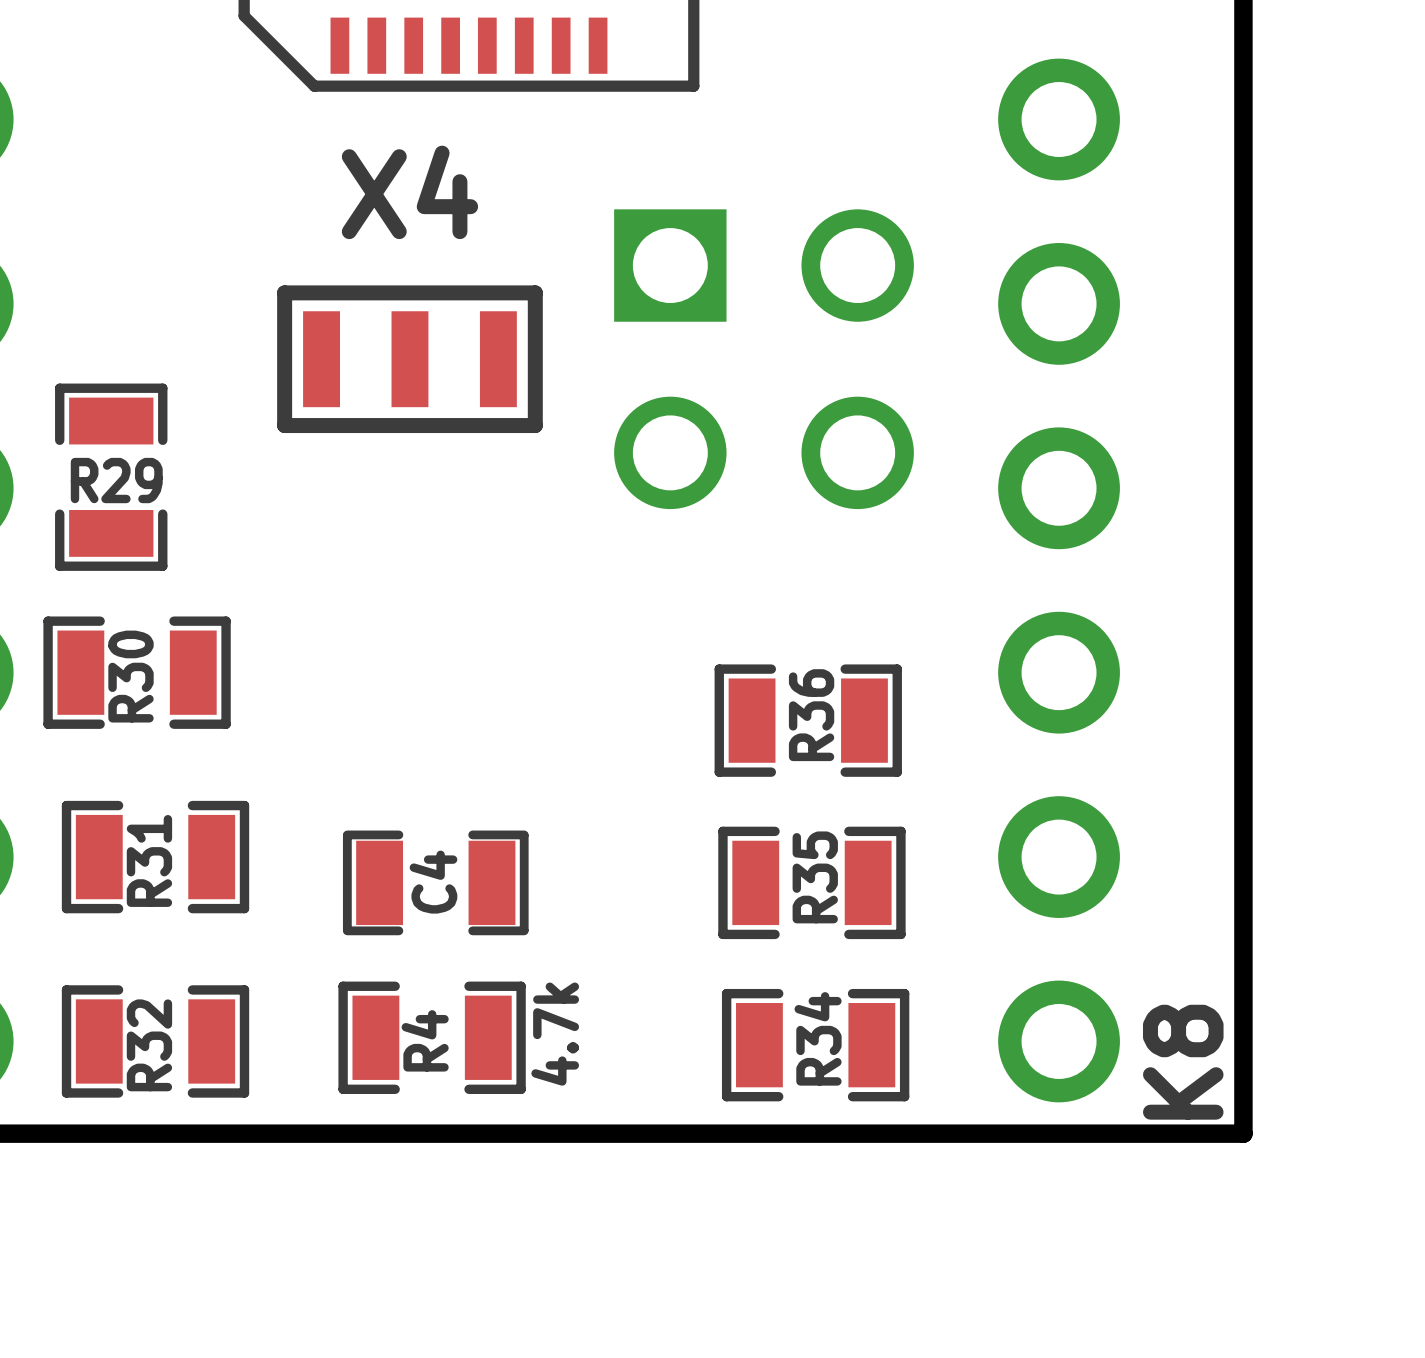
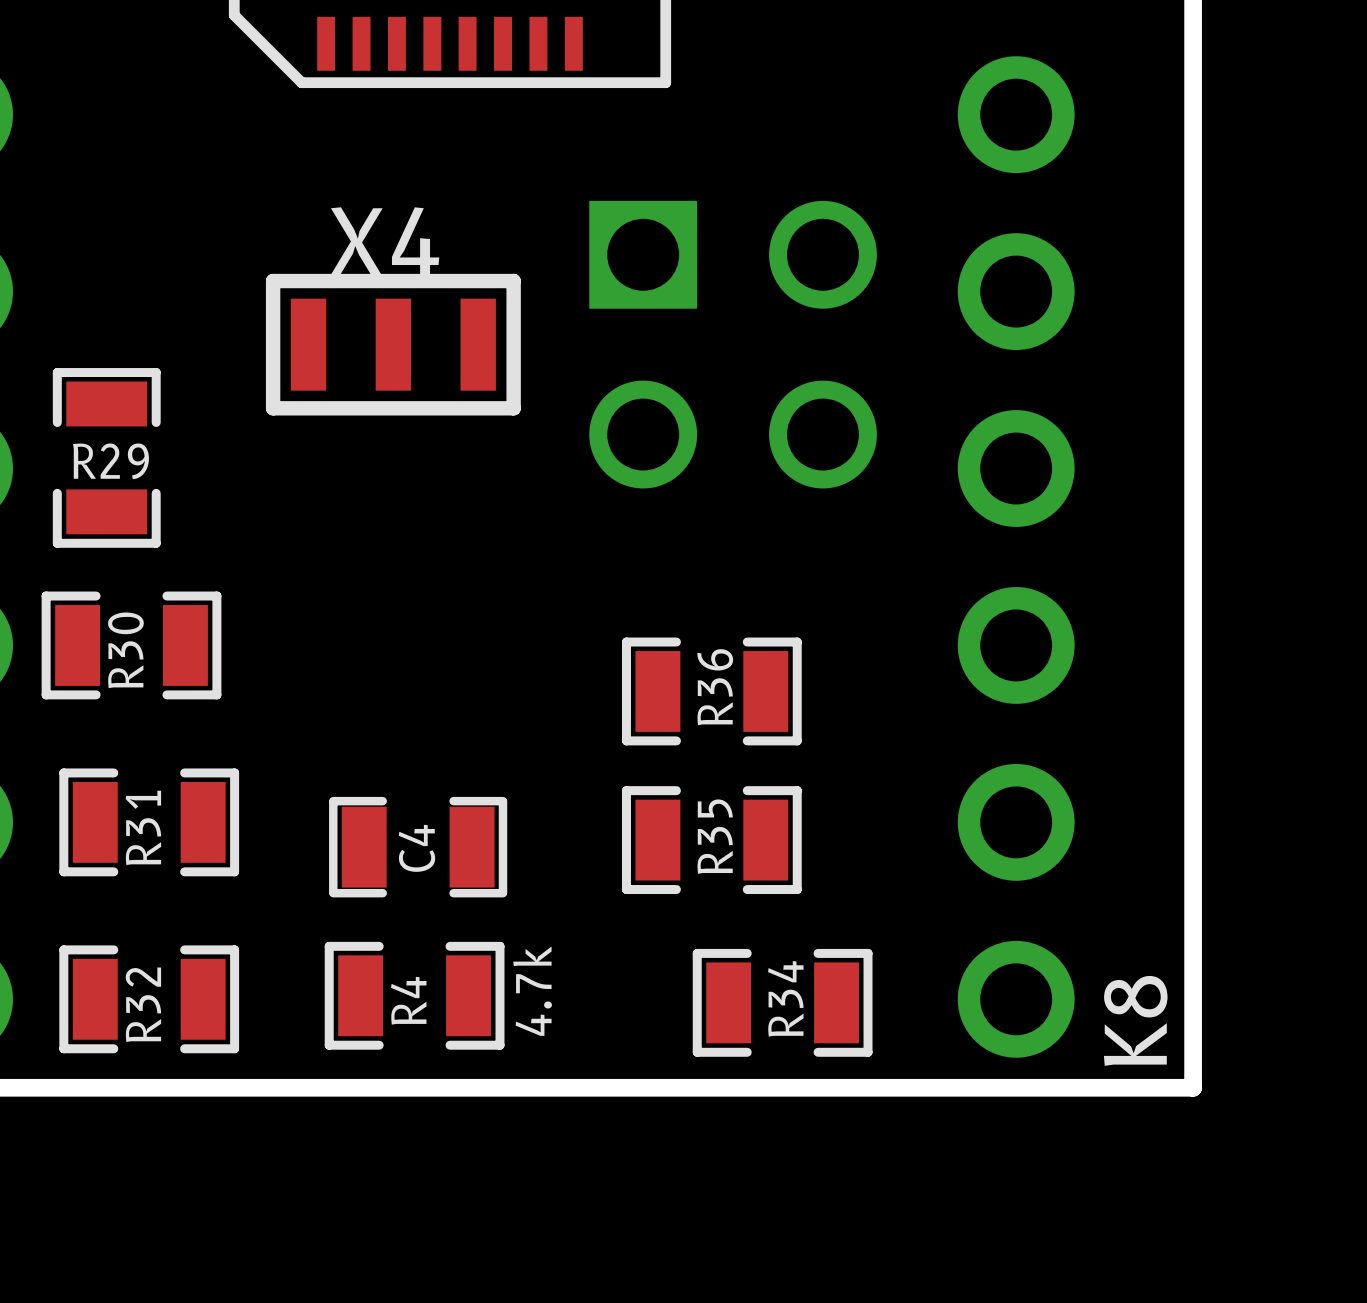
X4 name position: X4 (409, 192) -> X4 (383, 243)
R36 position: (808, 720) -> (711, 691)
R35 position: (811, 882) -> (711, 840)

